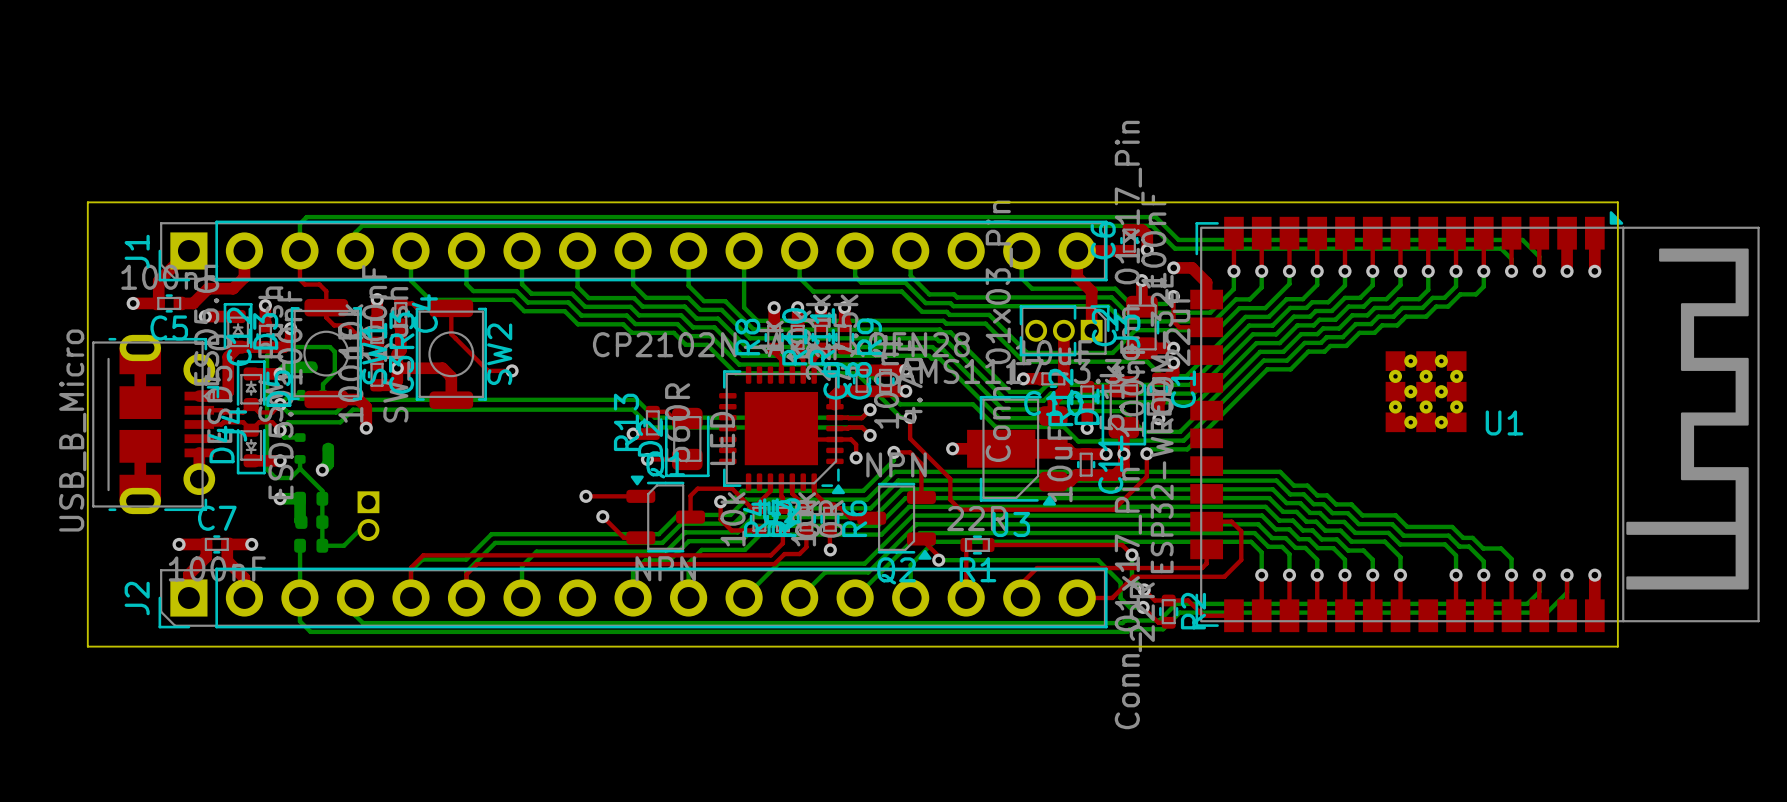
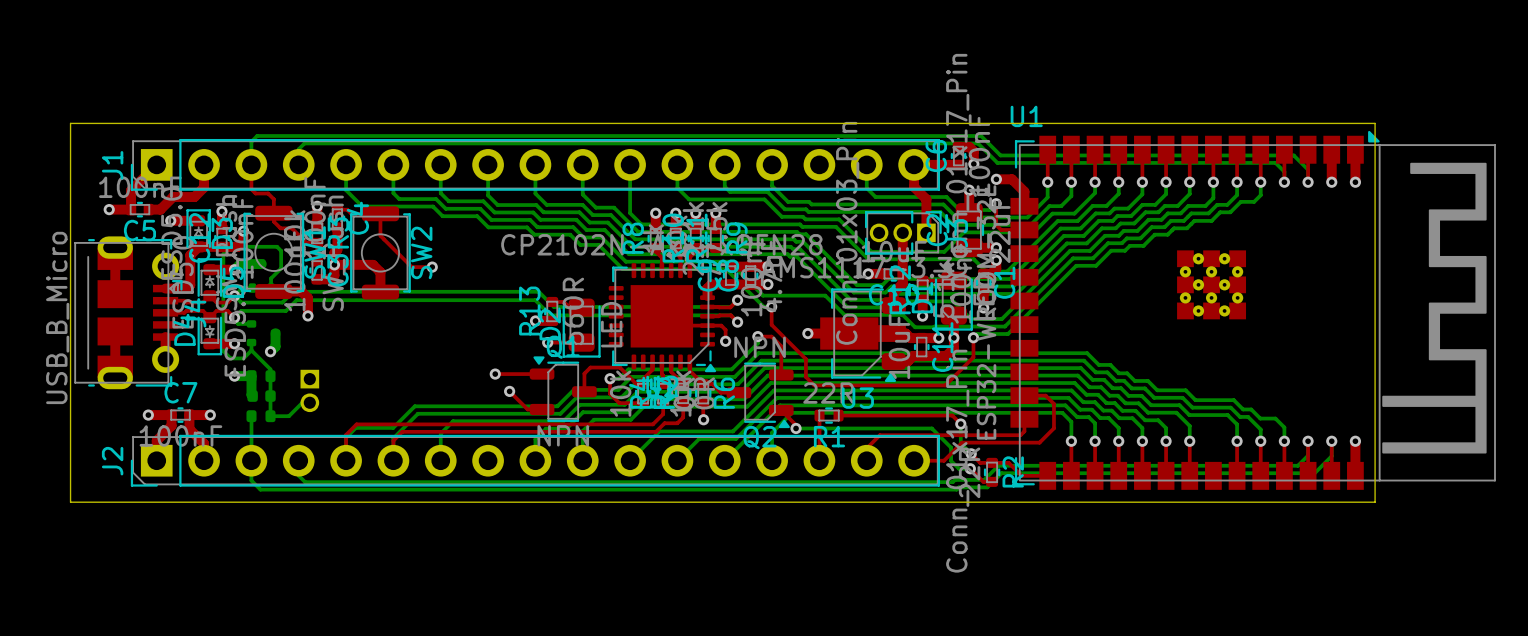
U1 name position: U1 (1504, 422) -> U1 (1026, 116)

